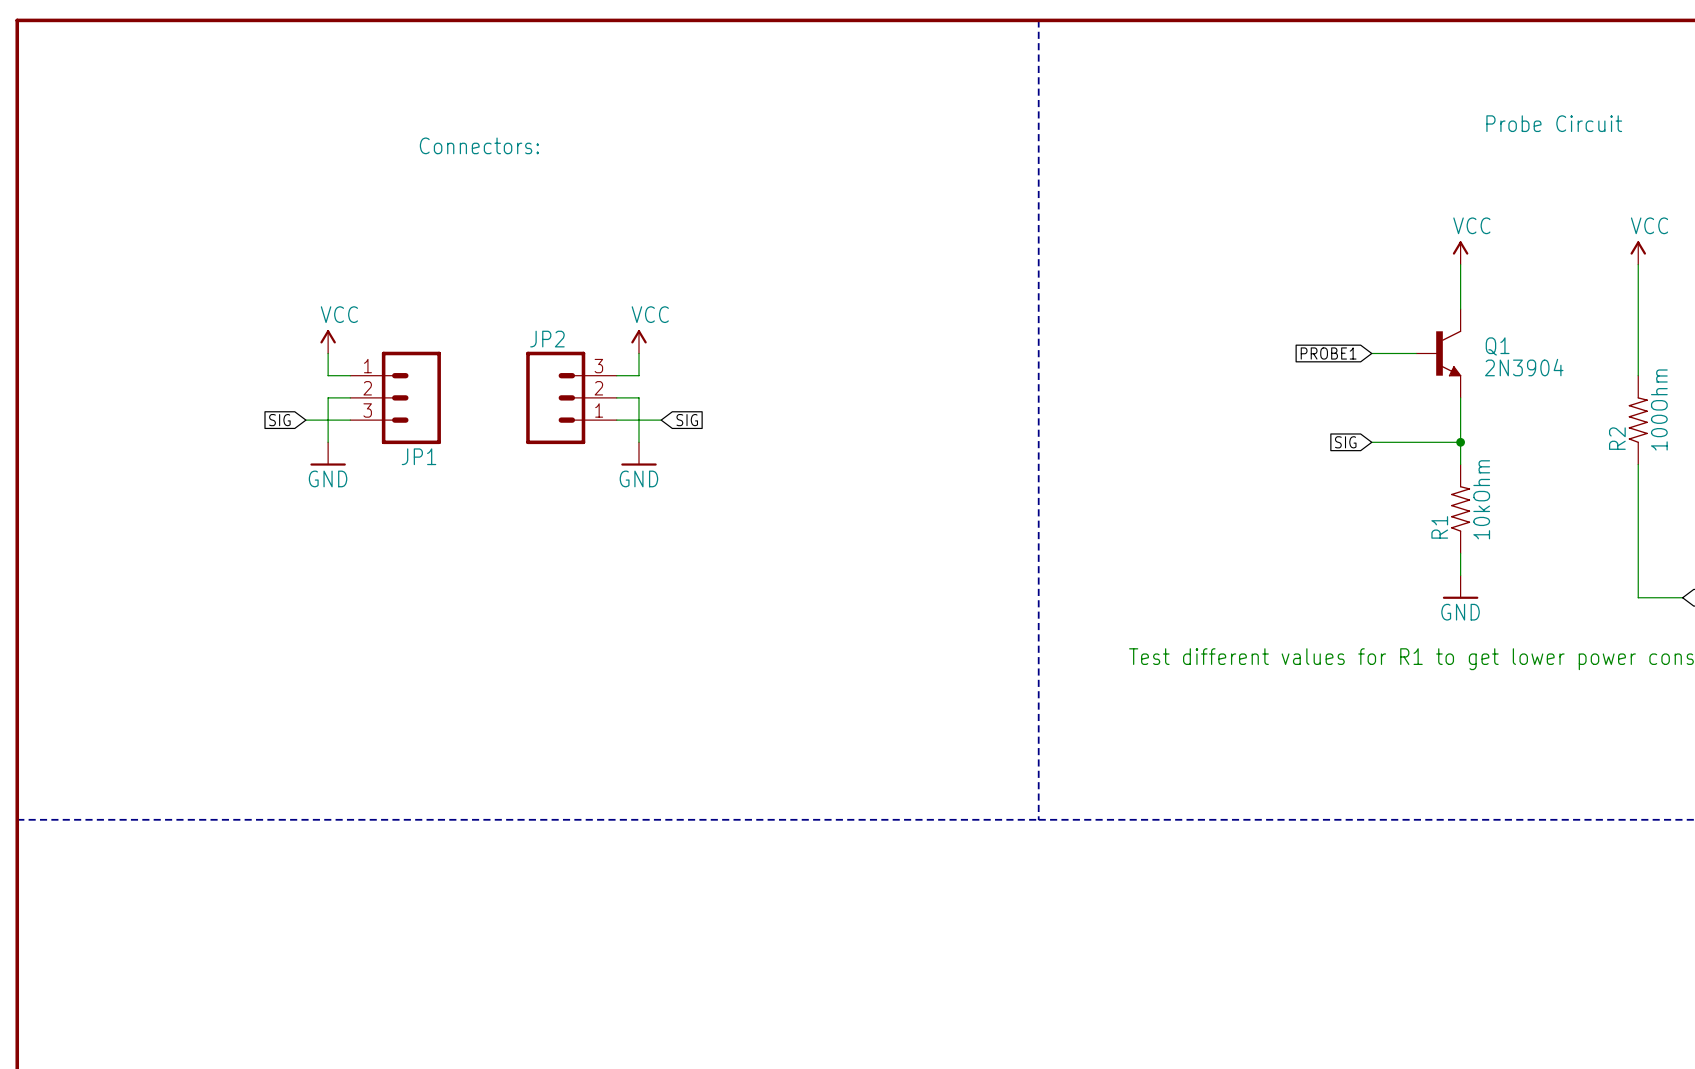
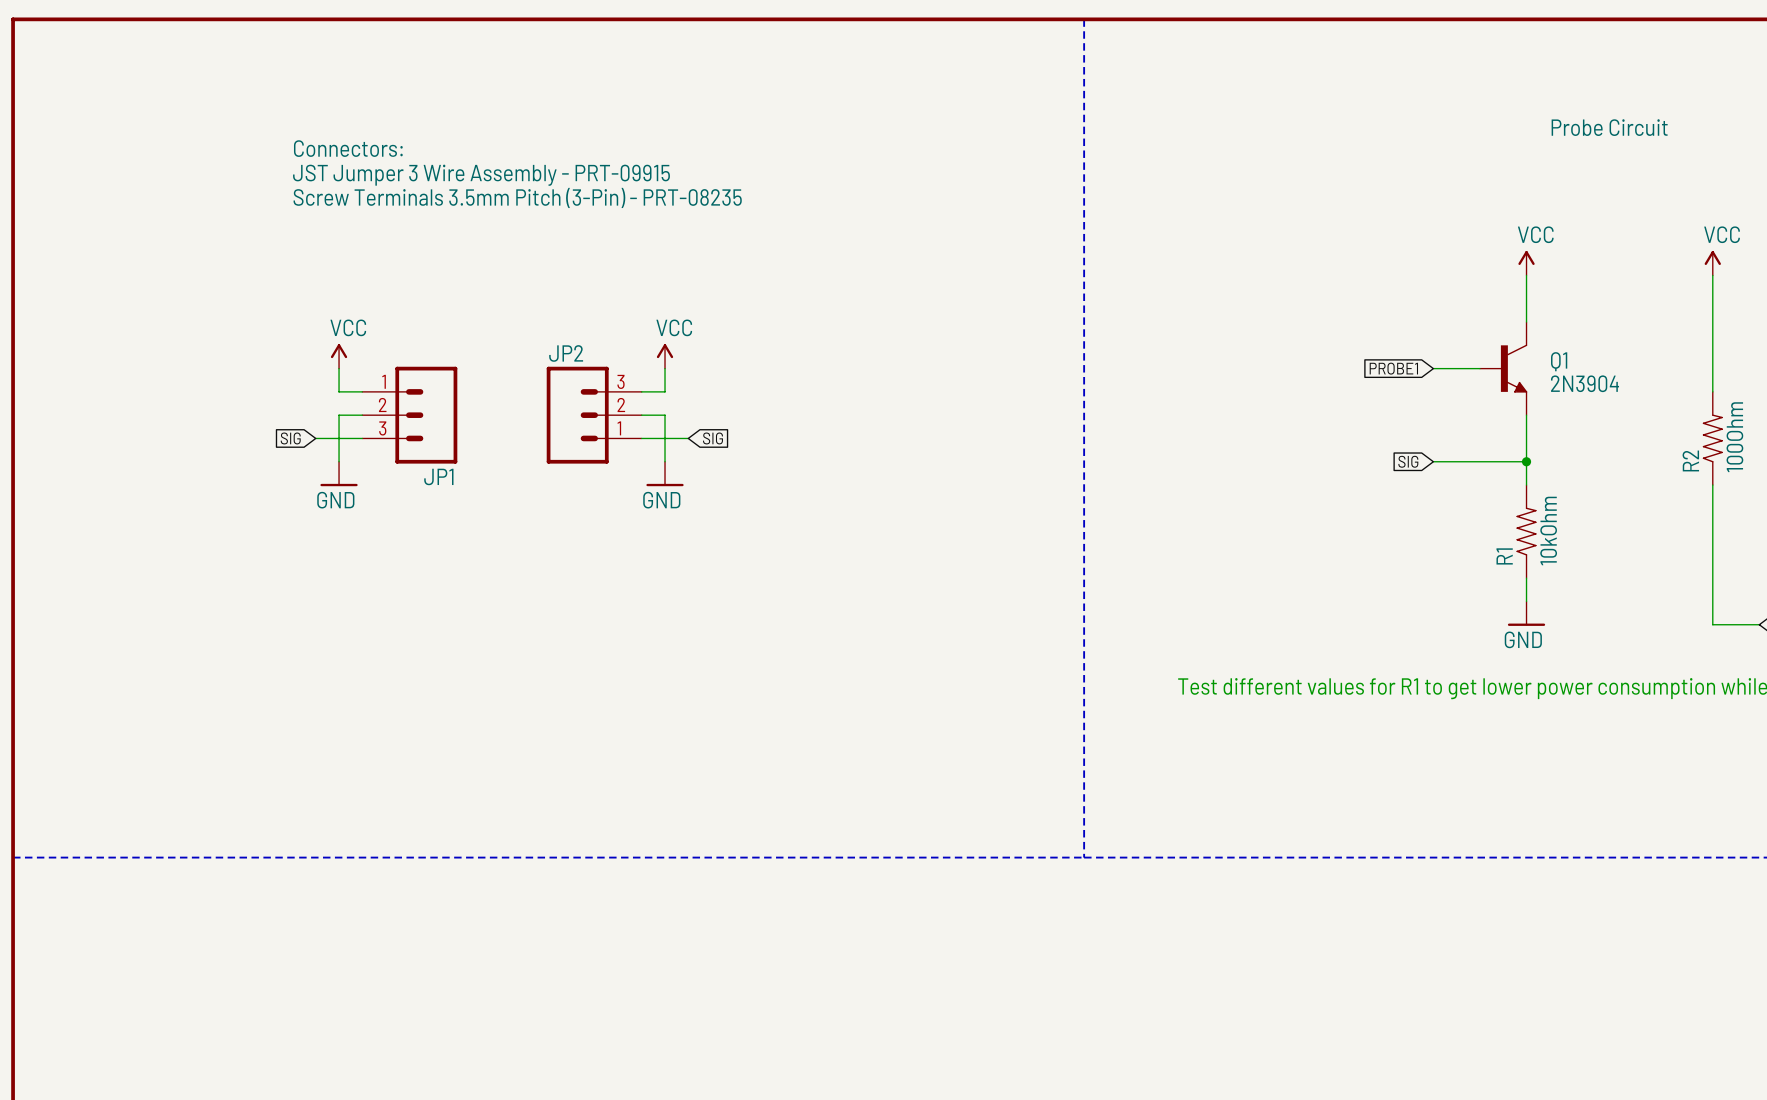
text position: Connectors: (479, 145) -> Connectors: (348, 148)
text: none -> JST Jumper 3 Wire Assembly - PRT-09915 (481, 175)
text: none -> Screw Terminals 3.5mm Pitch (3-Pin) - PRT-08235 (517, 197)

